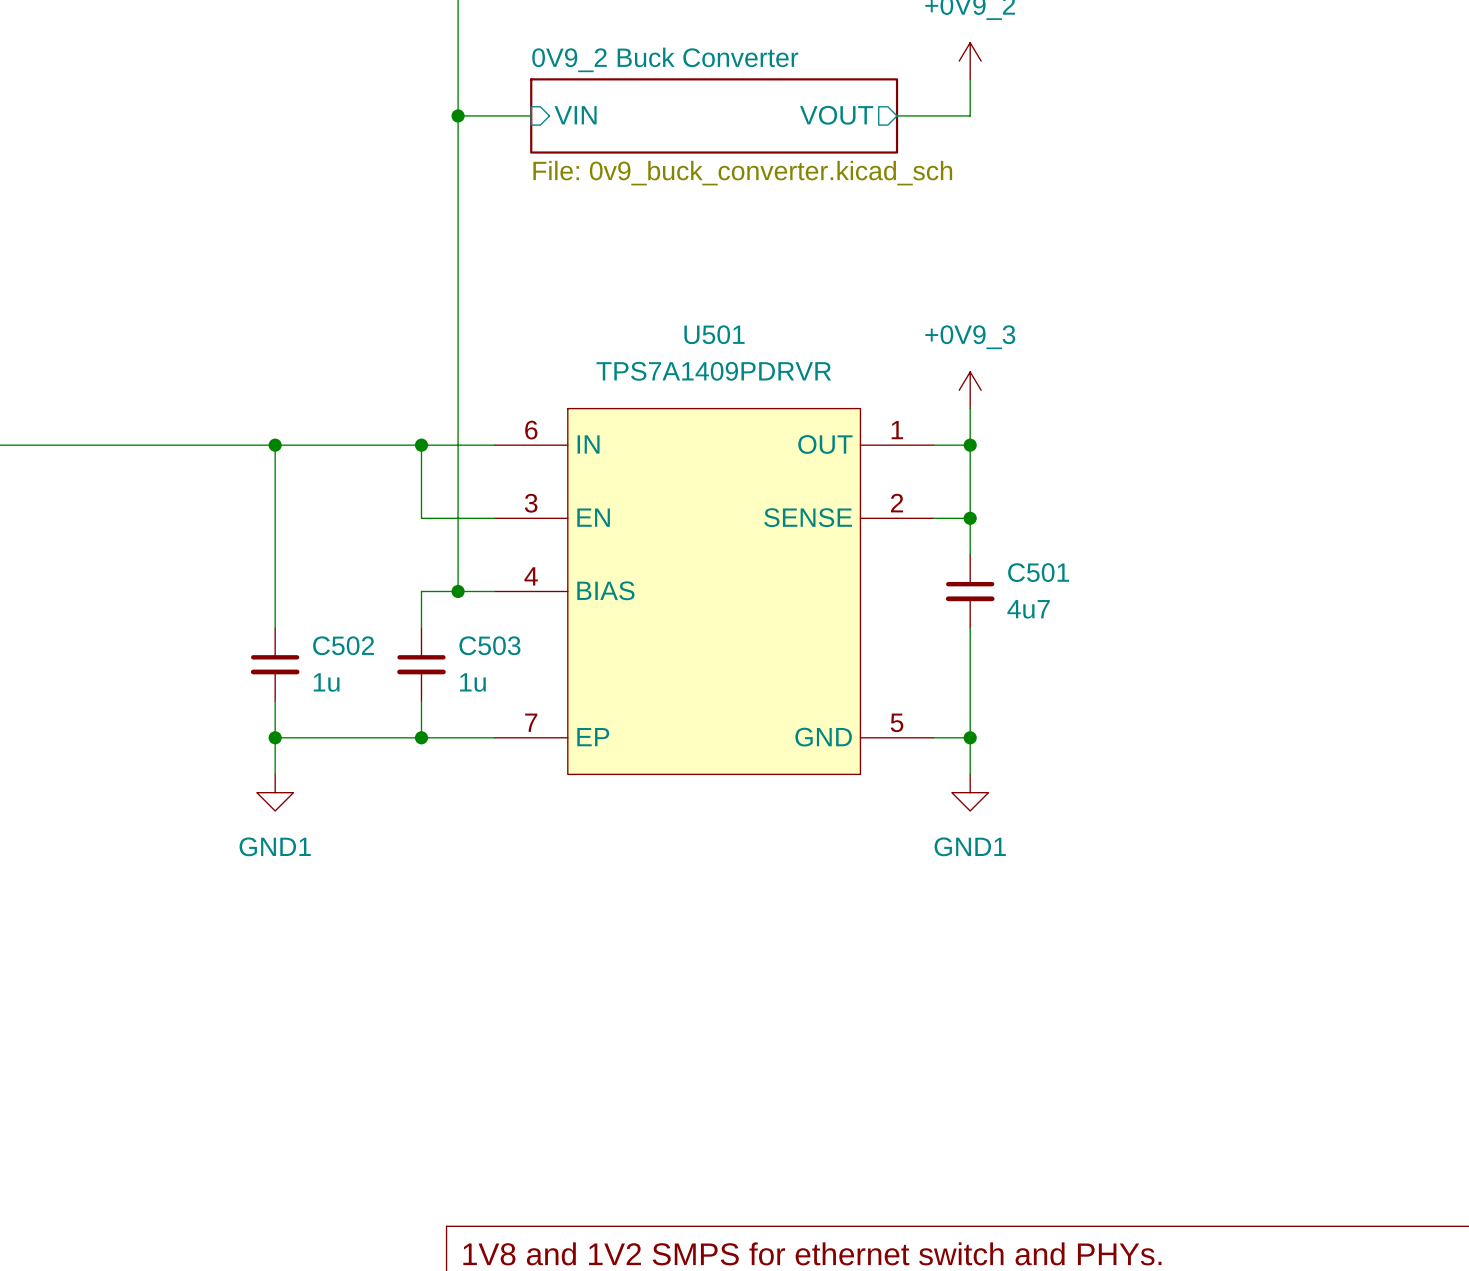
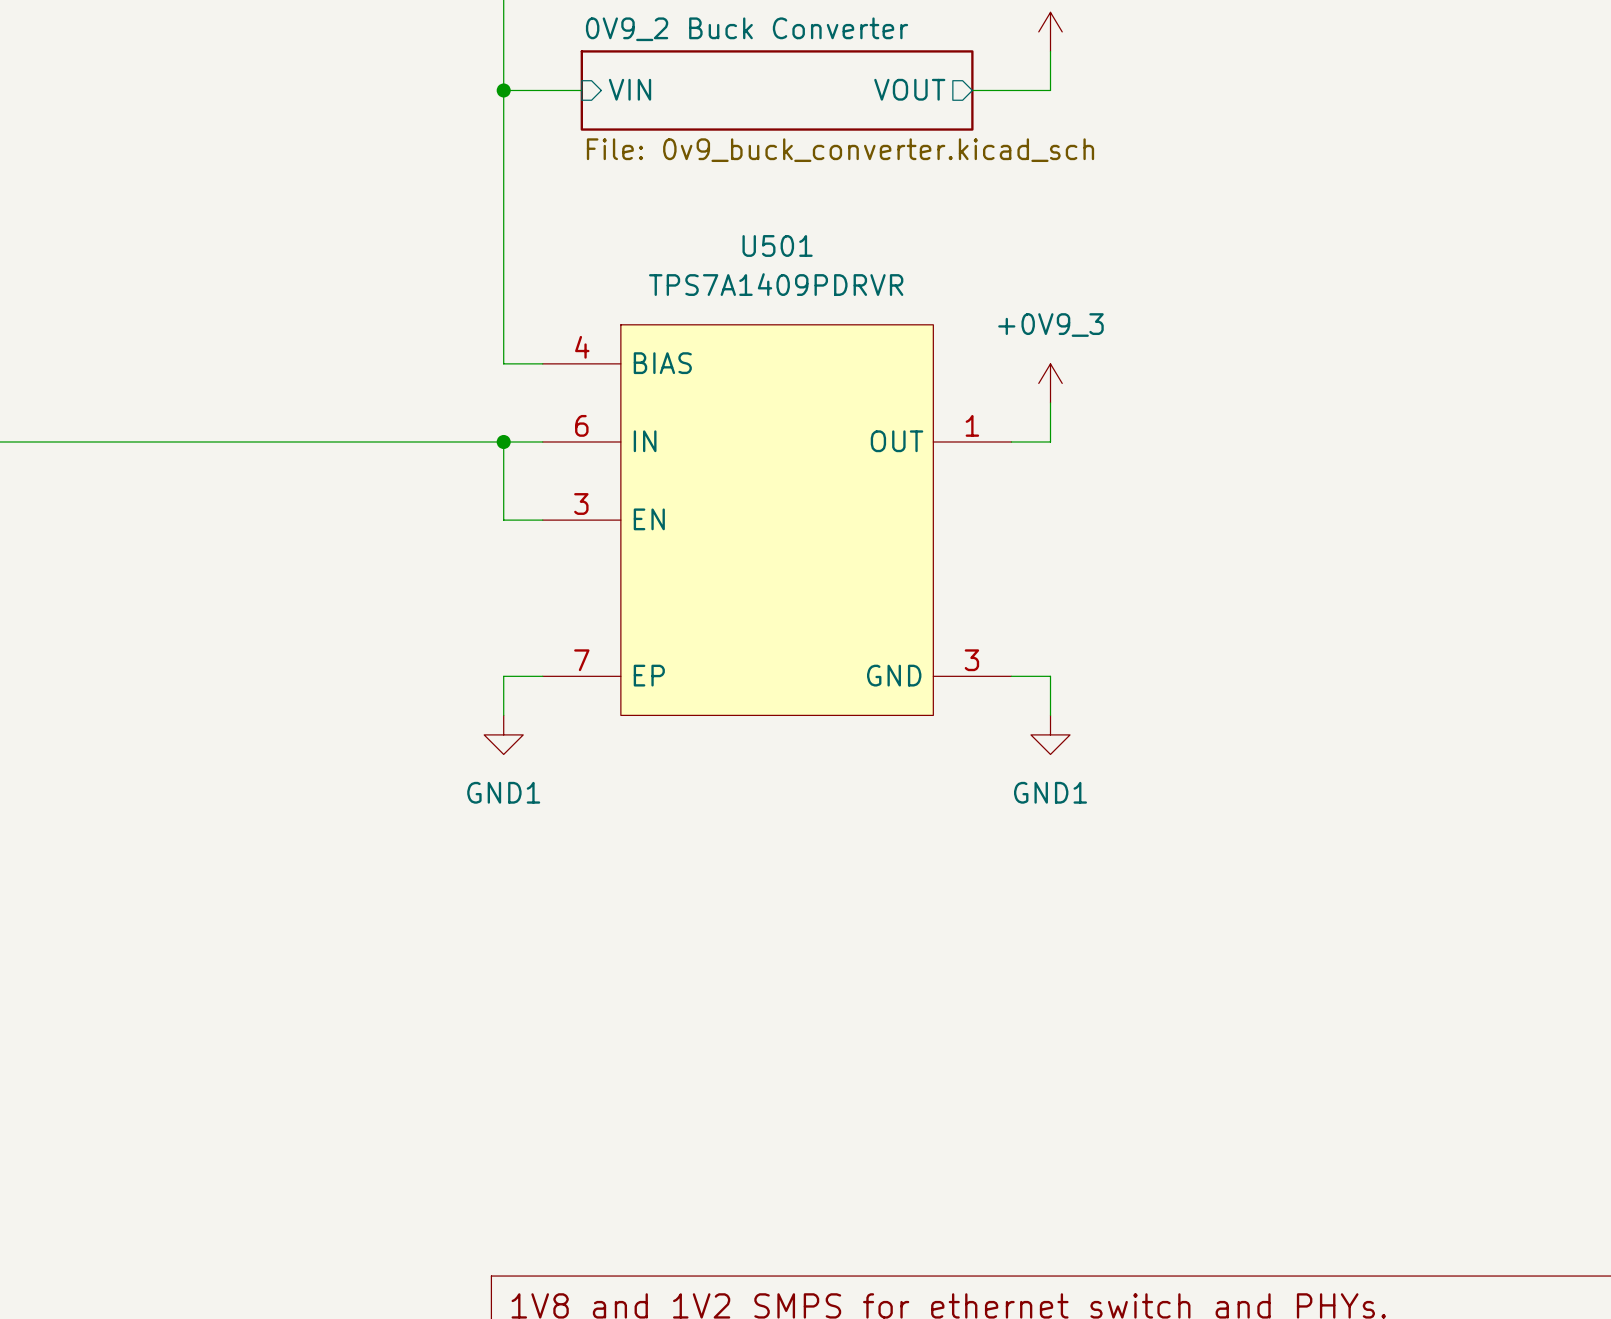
wire: (458, 372) (458, 445) -> (503, 363) (542, 363)
U501 symbol: [494, 408, 934, 775] -> [542, 324, 1012, 716]
wire: (275, 445) (275, 628) -> none
junction: (275, 445) -> none
wire: (421, 445) (421, 518) (458, 518) (458, 591) -> none
junction position: (421, 445) -> (503, 441)
wire: (970, 445) (970, 554) -> none
junction: (970, 445) -> none
wire: (933, 518) (970, 518) -> none
junction: (970, 518) -> none
junction: (458, 591) -> none
wire: (494, 591) (421, 591) (421, 628) -> none
C501: 4u7 (970, 591) -> none
wire: (970, 628) (970, 664) -> (1011, 676) (1050, 676)
C502: 1u (275, 664) -> none
C503: 1u (421, 664) -> none
wire: none -> (542, 676) (503, 676) (503, 715)
wire: (275, 701) (275, 774) -> none
wire: (421, 701) (421, 737) -> none
wire: (970, 701) (970, 774) -> none
wire: (275, 737) (494, 737) -> none
junction: (275, 737) -> none
junction: (421, 737) -> none
wire: (933, 737) (970, 737) -> none
junction: (970, 737) -> none
power symbol position: GND1 (275, 792) -> GND1 (503, 734)
power symbol position: GND1 (970, 792) -> GND1 (1050, 734)

